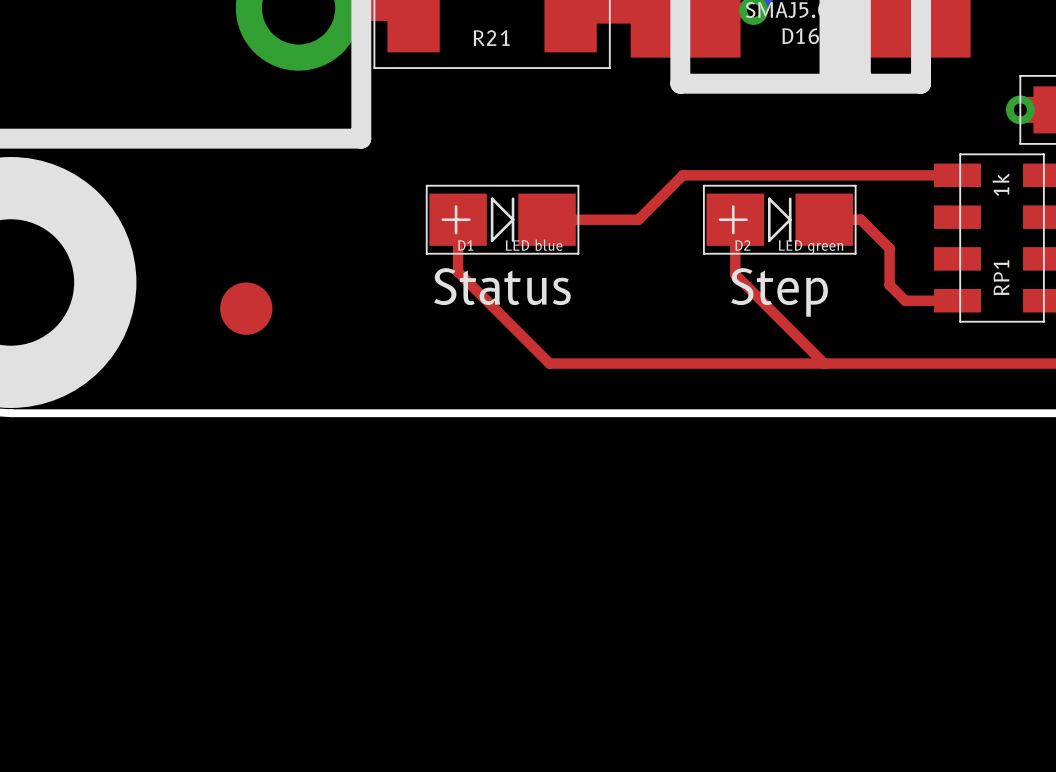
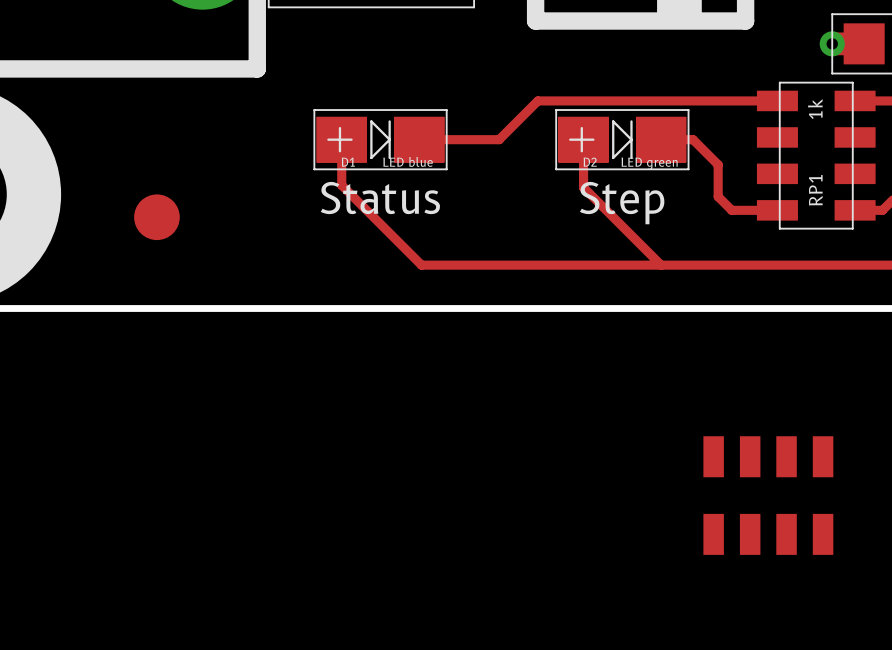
part: none -> (380, 139)
part: none -> (622, 139)
part: none -> (768, 495)

